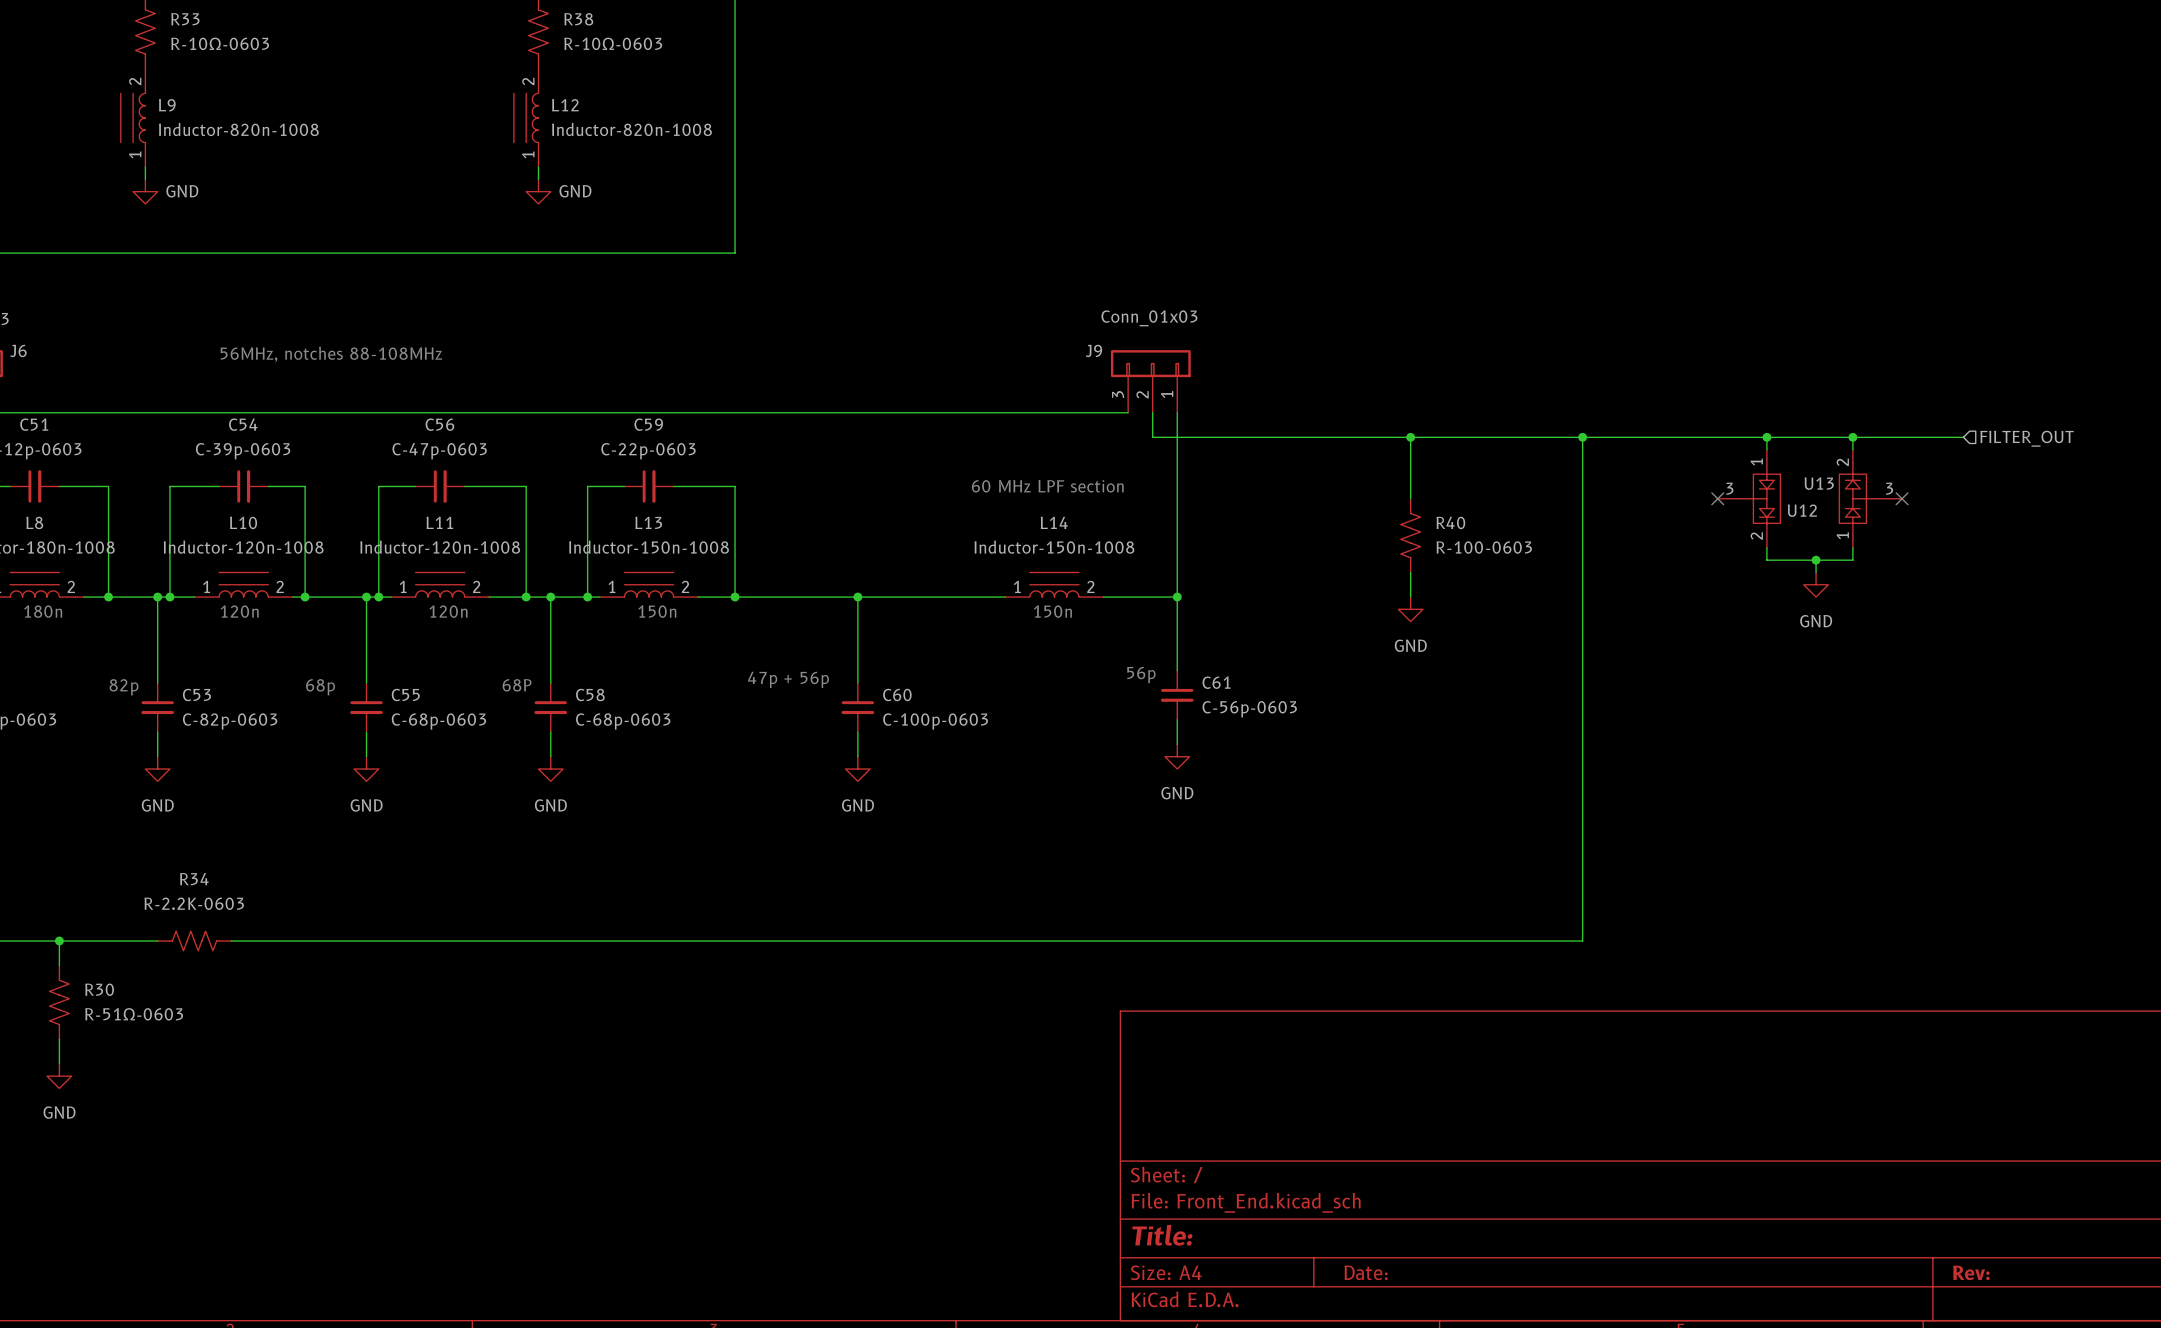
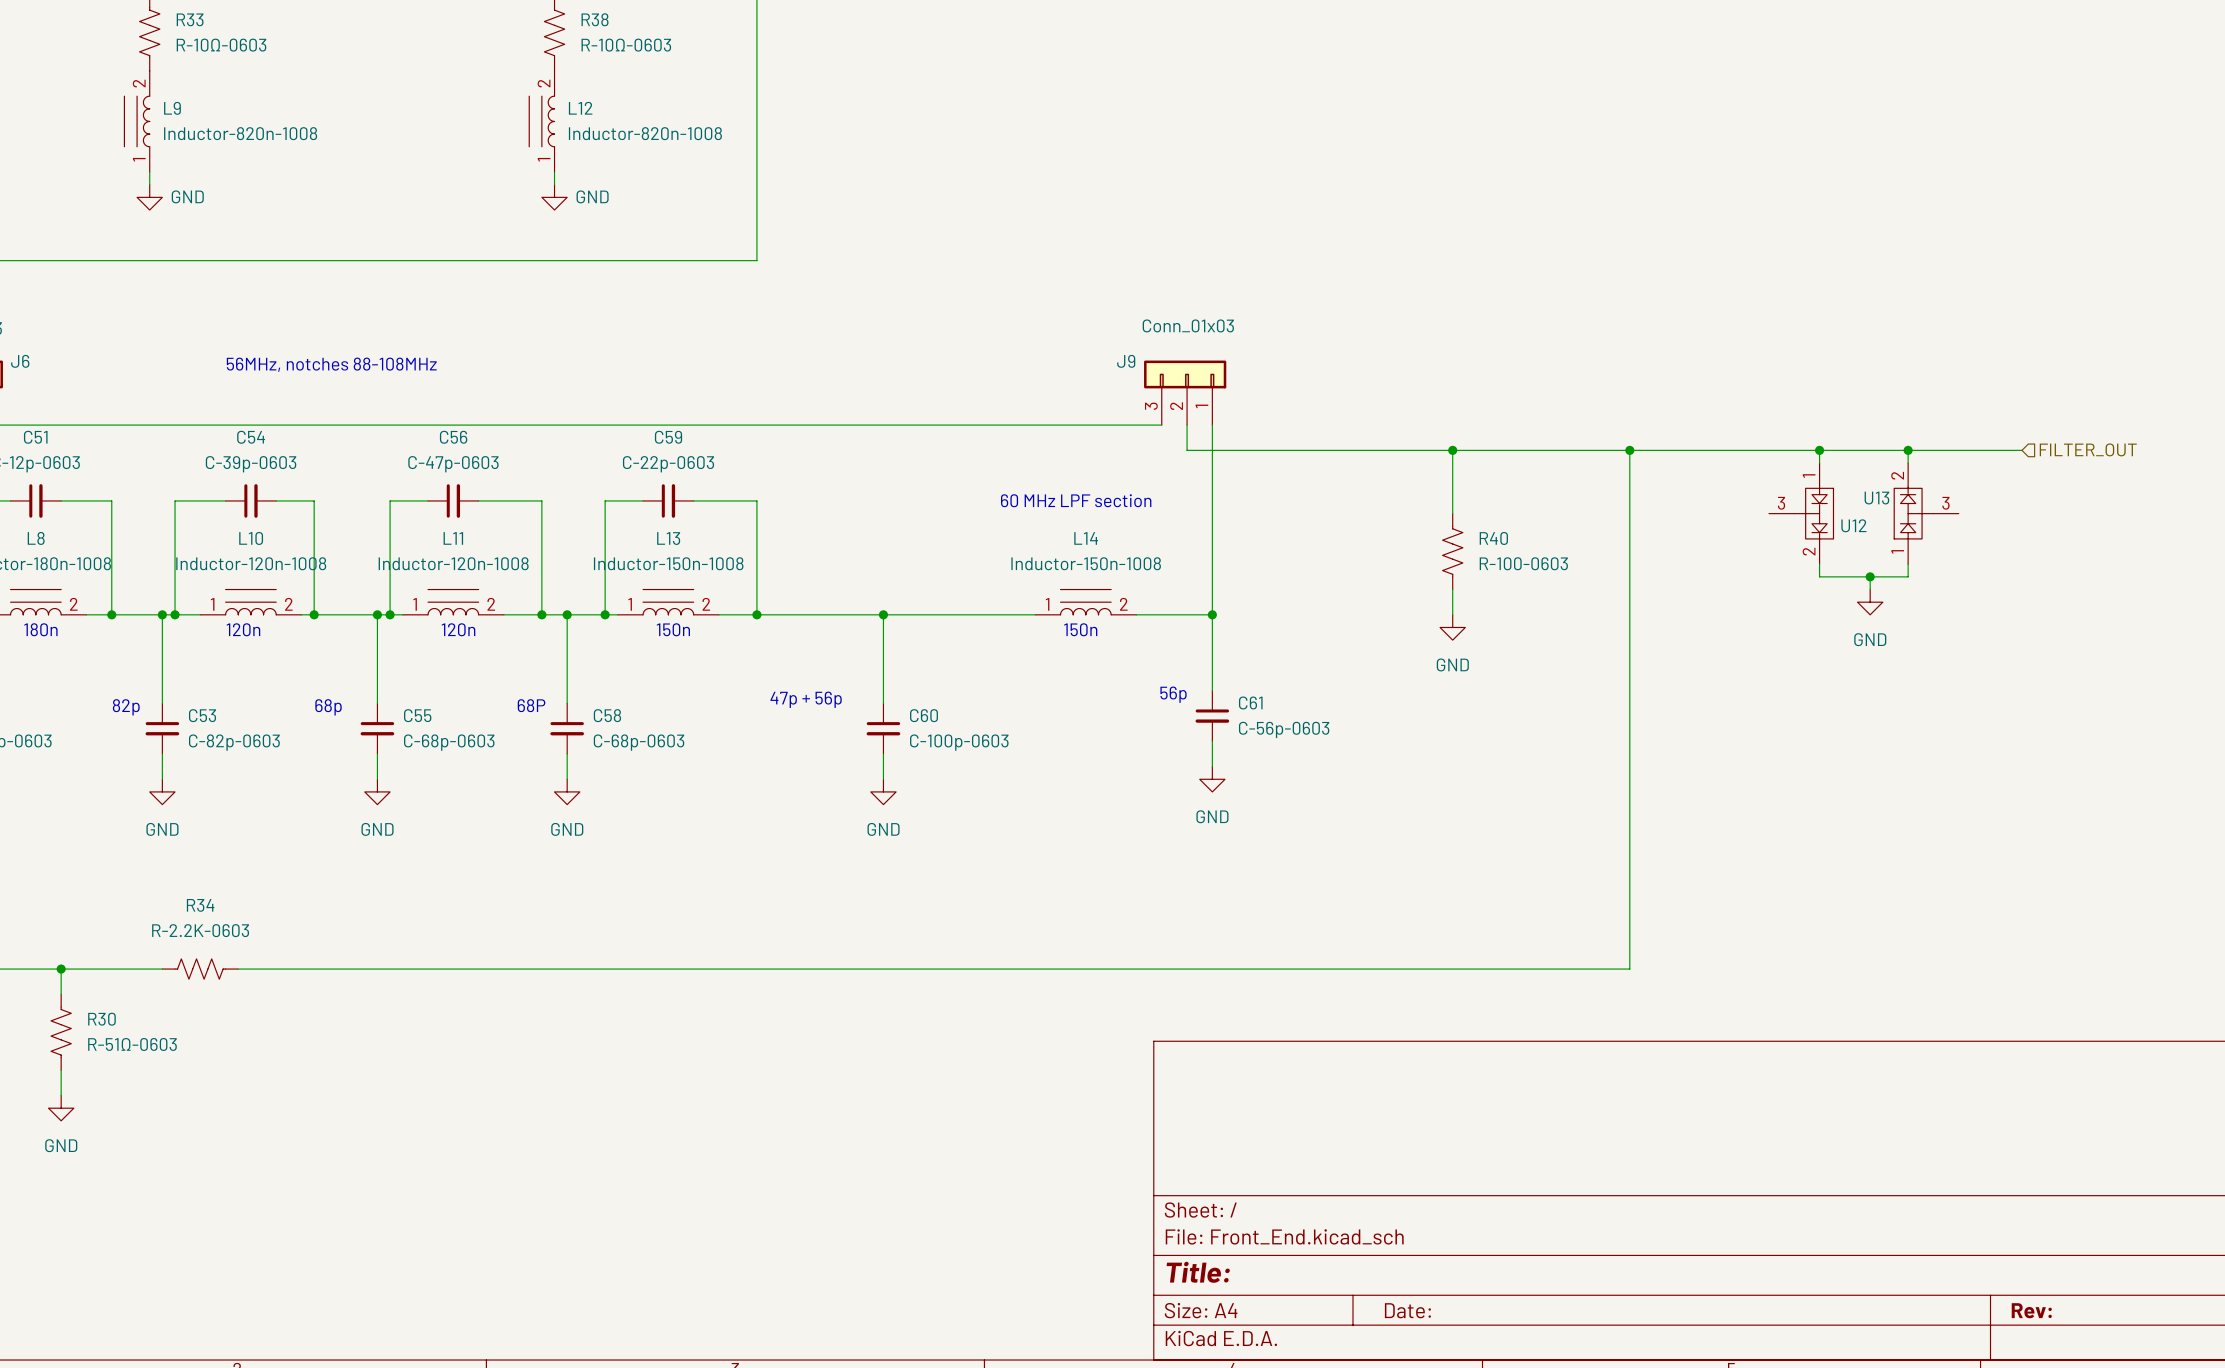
no-connect mark: (1717, 498) -> none
no-connect mark: (1902, 498) -> none

